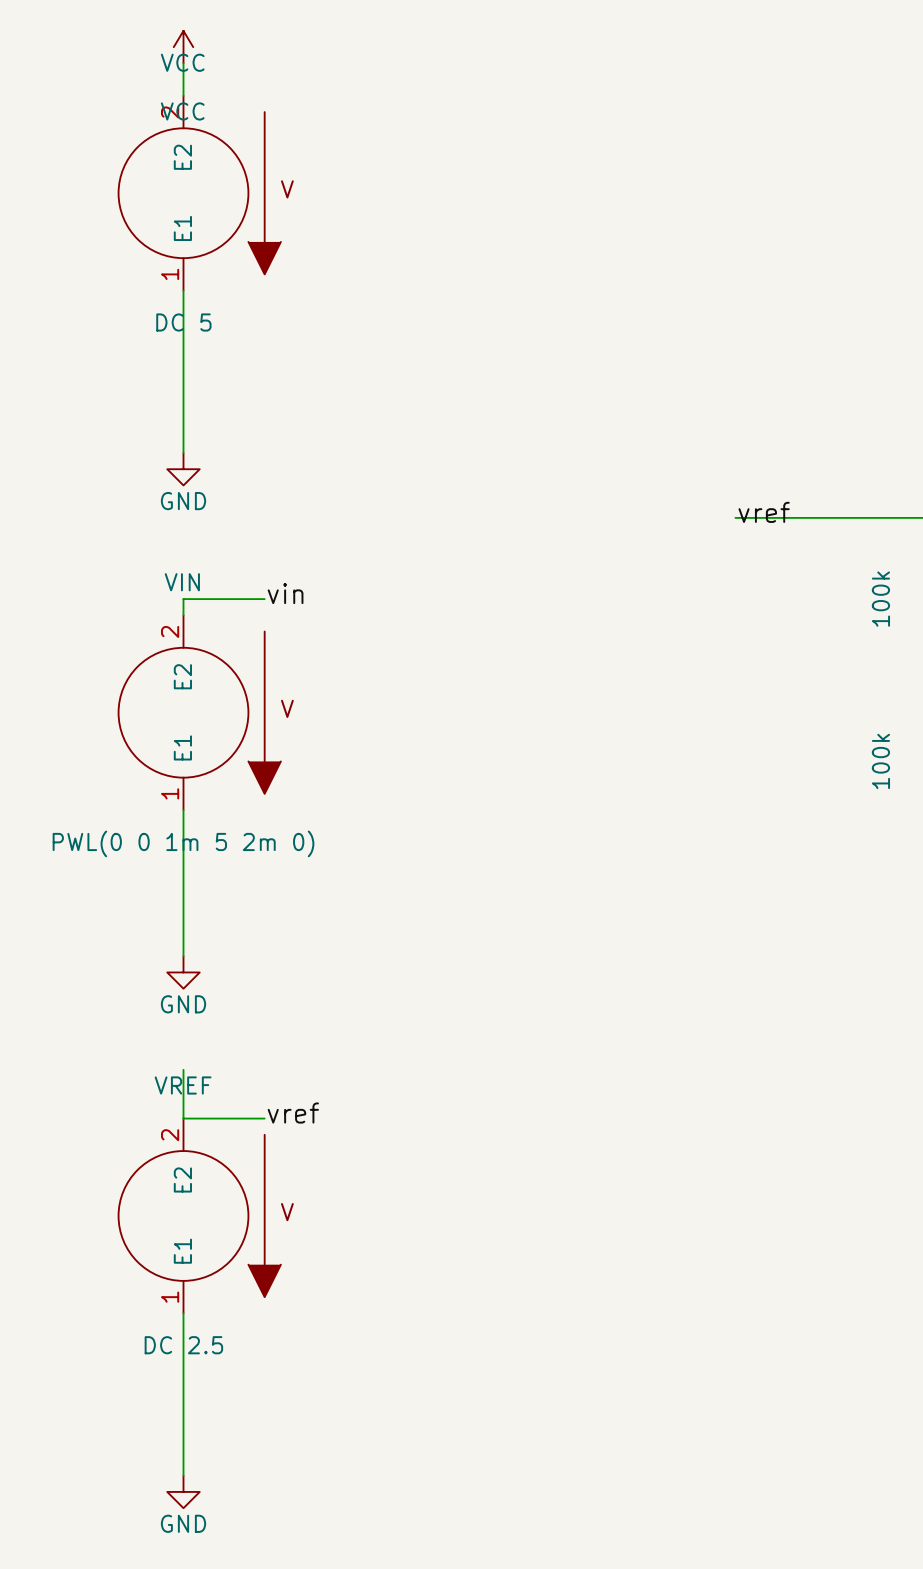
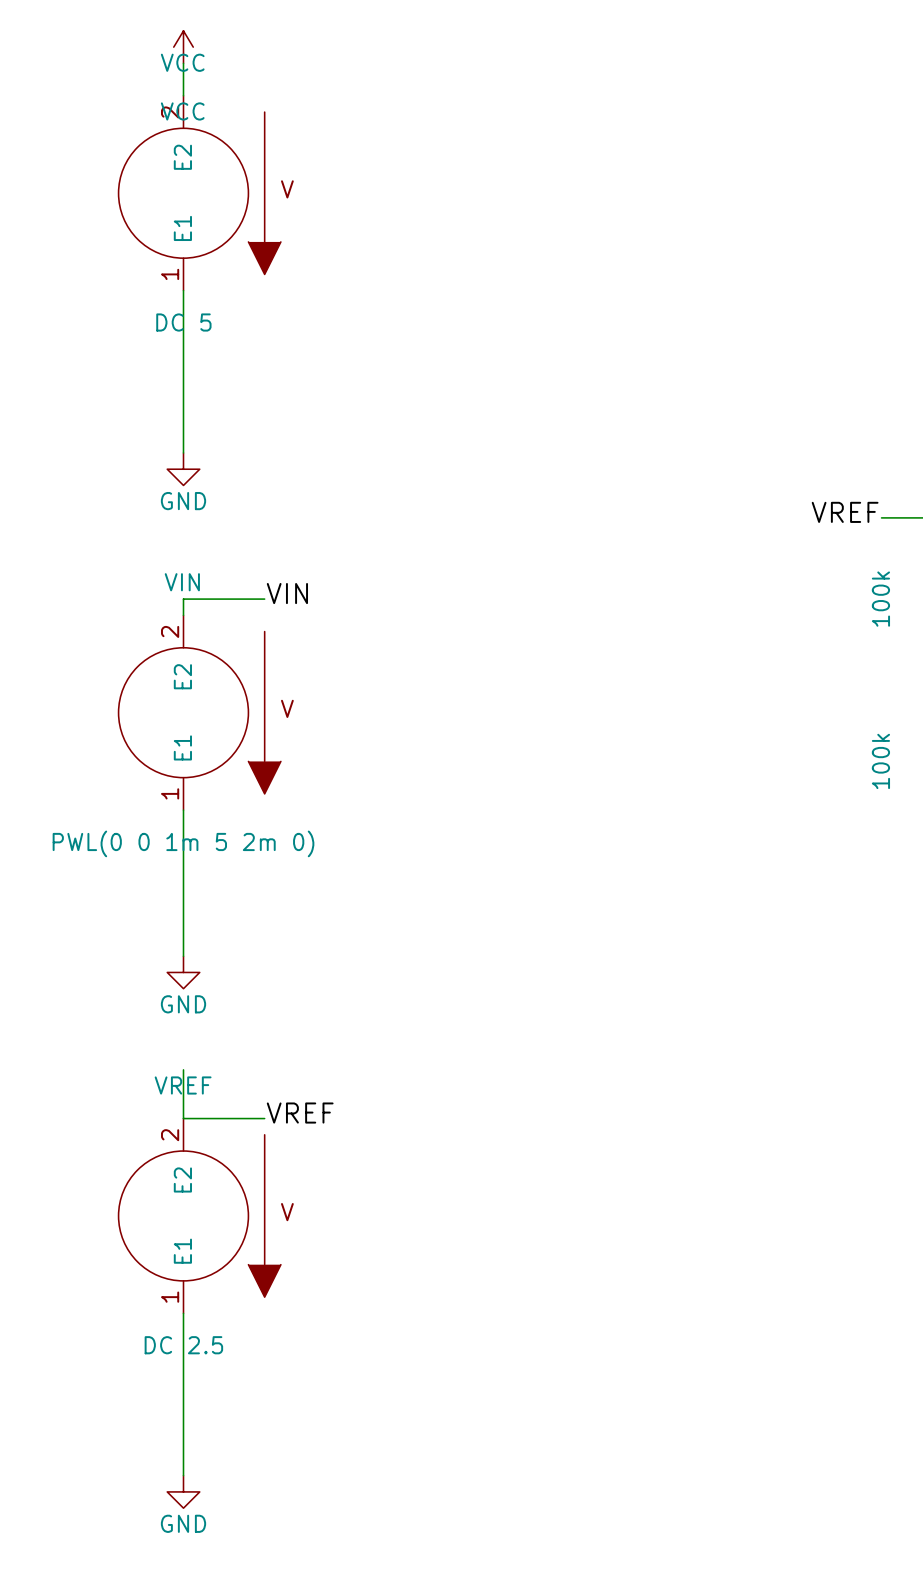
label: vref (764, 512) -> none
label: none -> VREF (845, 512)
wire: (735, 517) (881, 517) -> none
label: vin (285, 593) -> VIN (287, 593)
label: vref (293, 1113) -> VREF (300, 1113)

